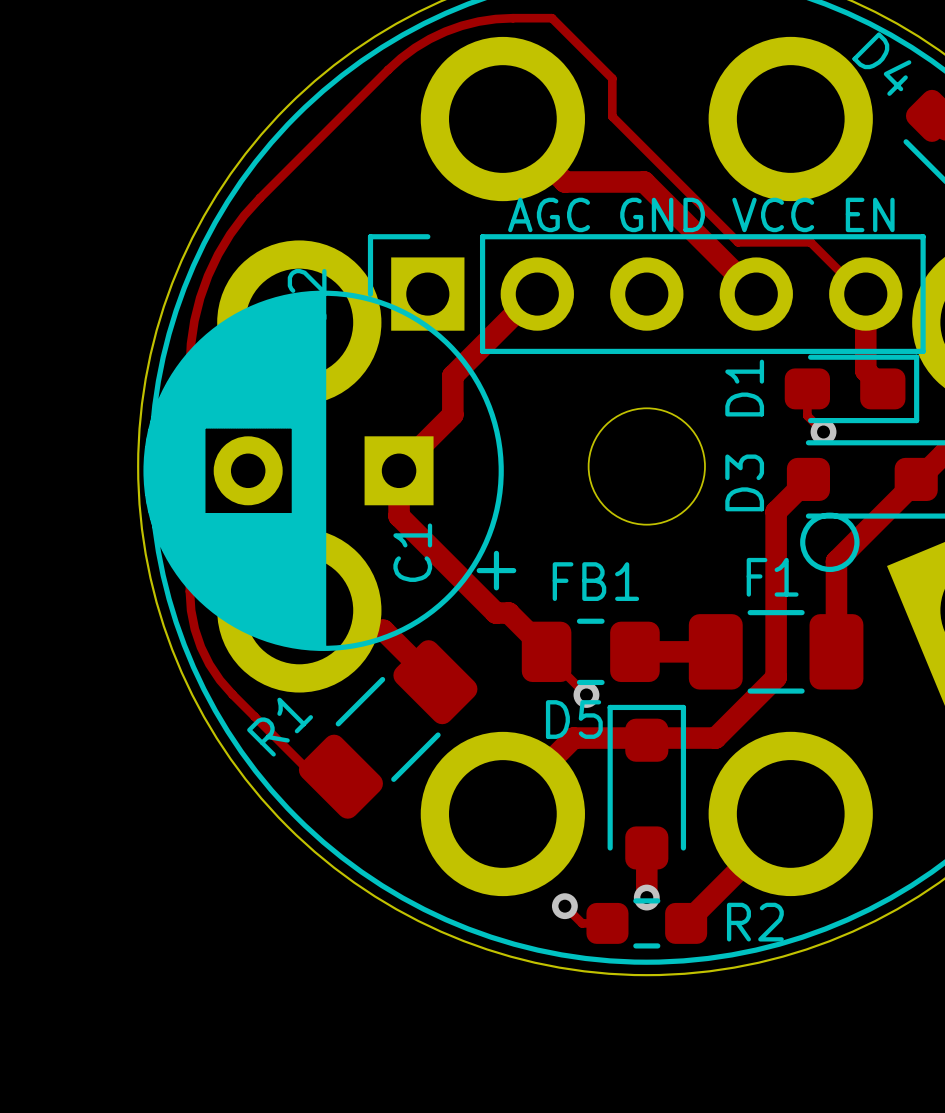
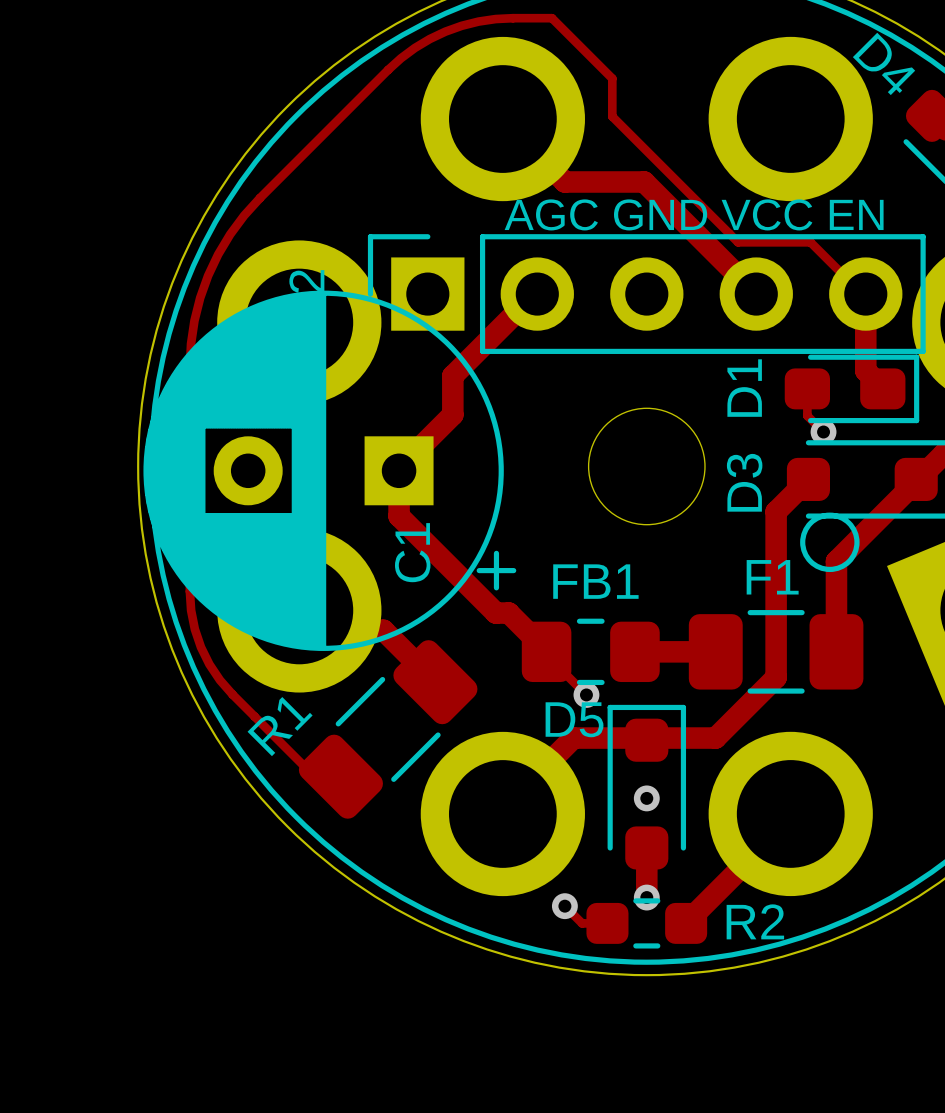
via: none -> (646, 798)

